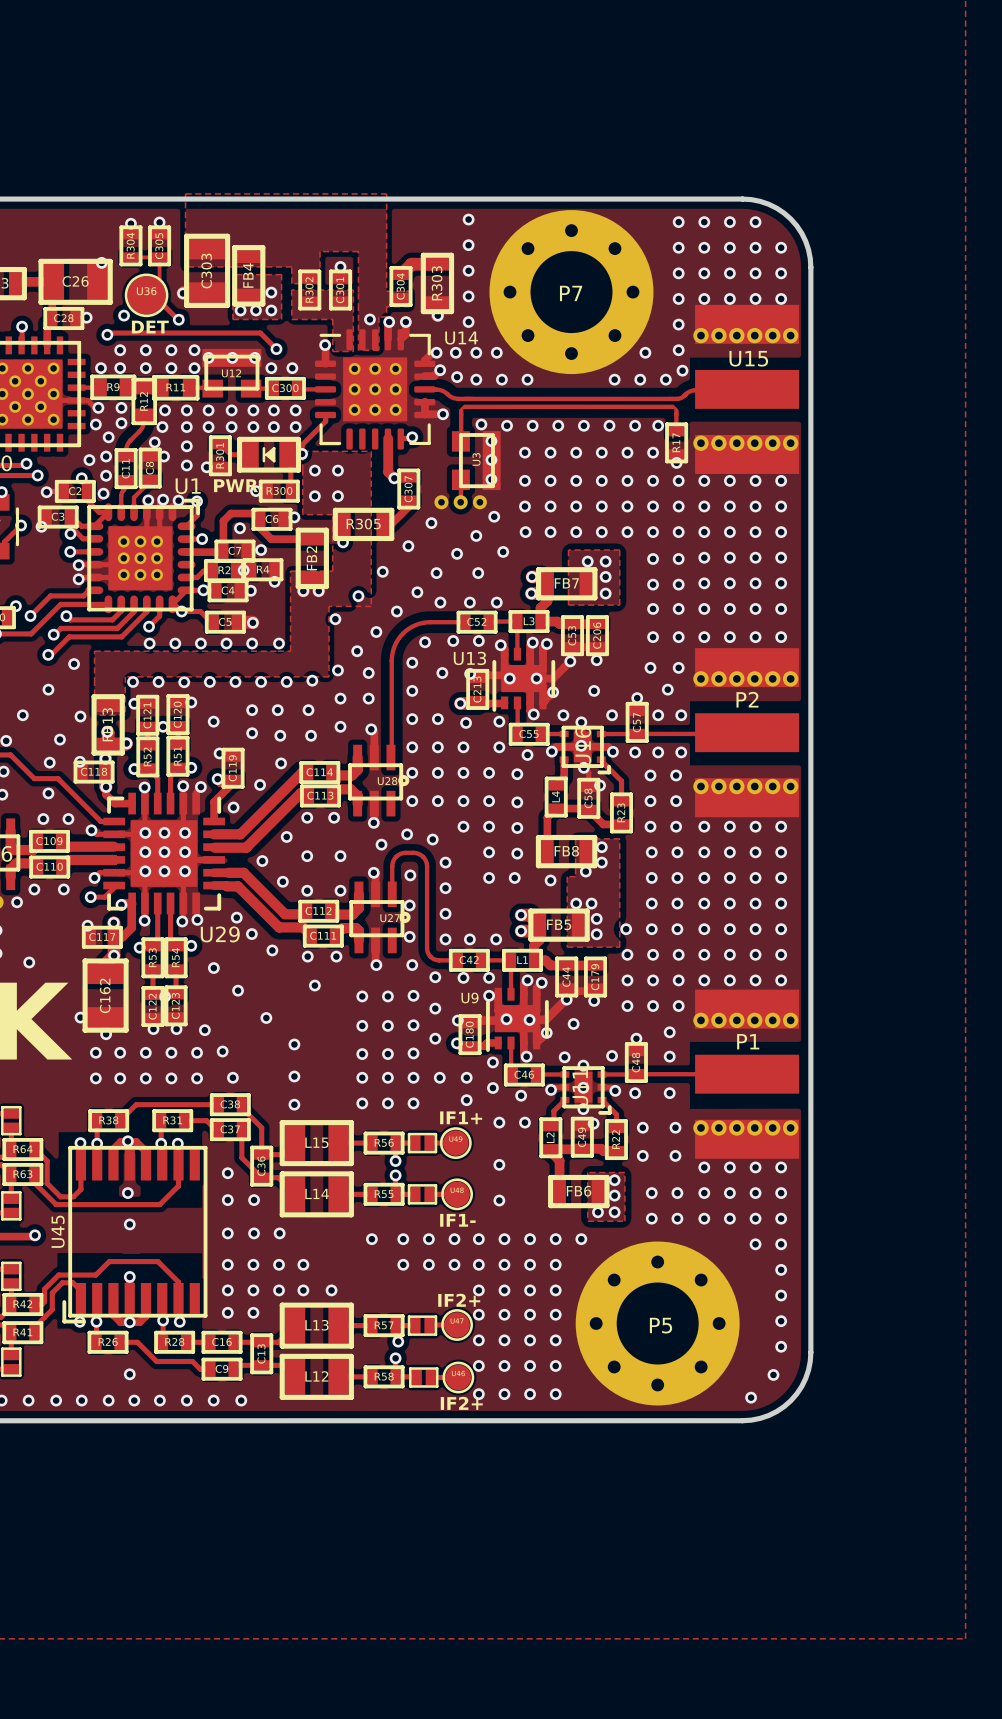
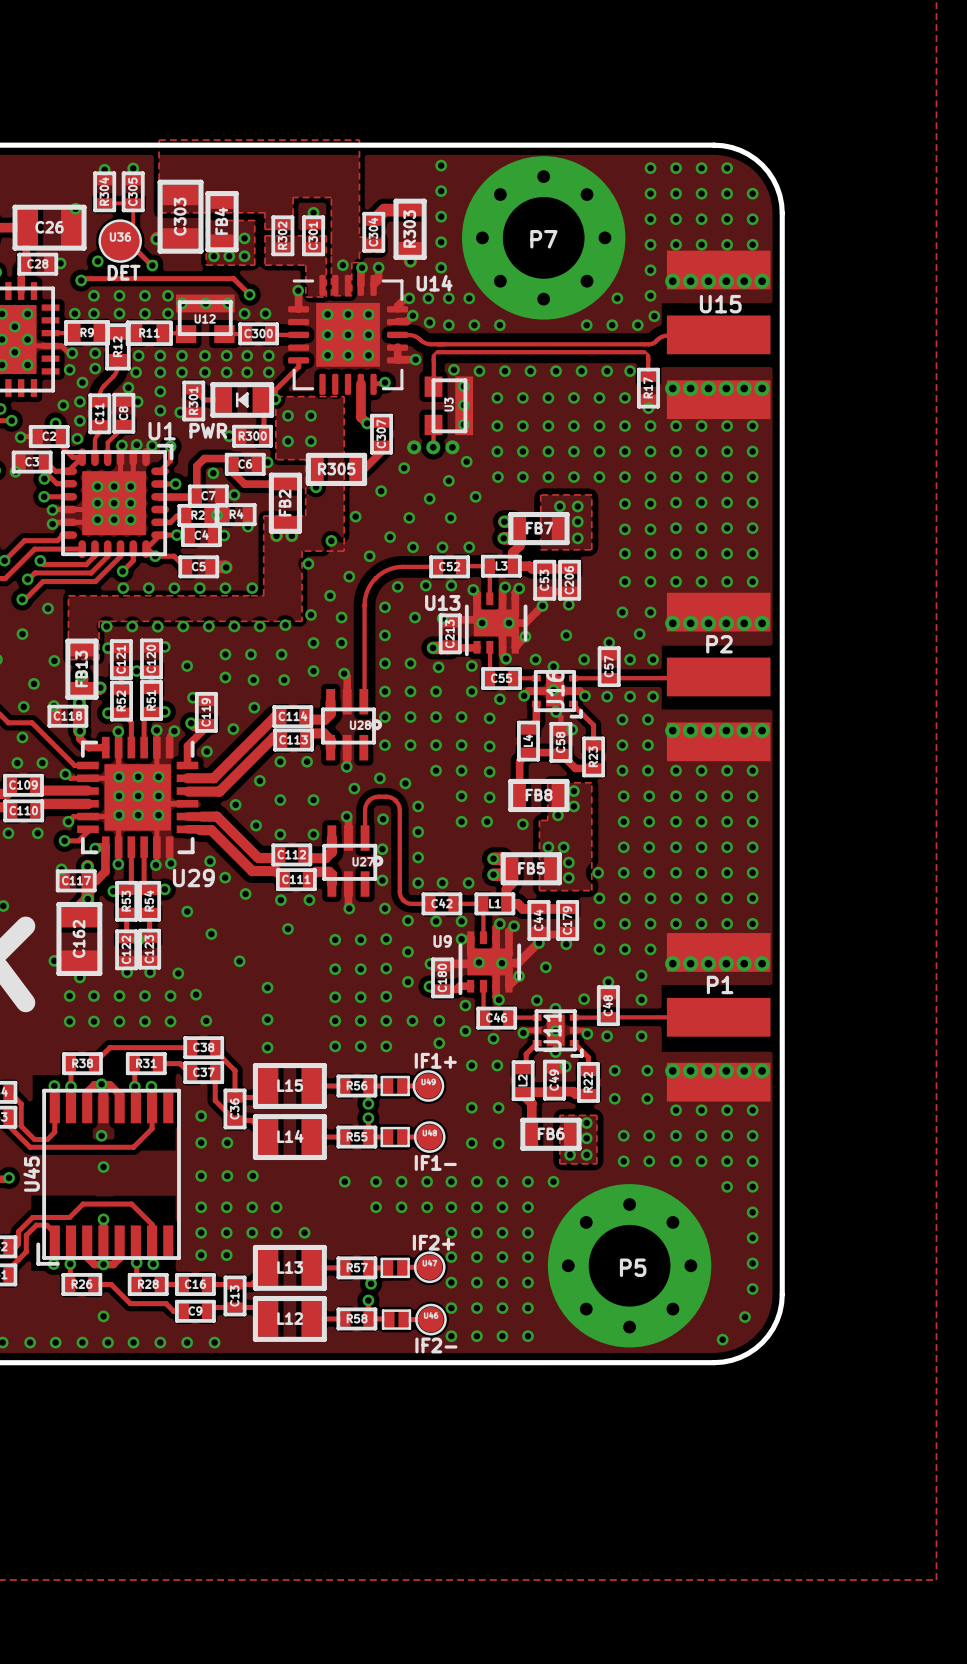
via: none -> (498, 1107)
via: none -> (498, 1143)
text: IF2+ (461, 1403) -> IF2- (436, 1345)

